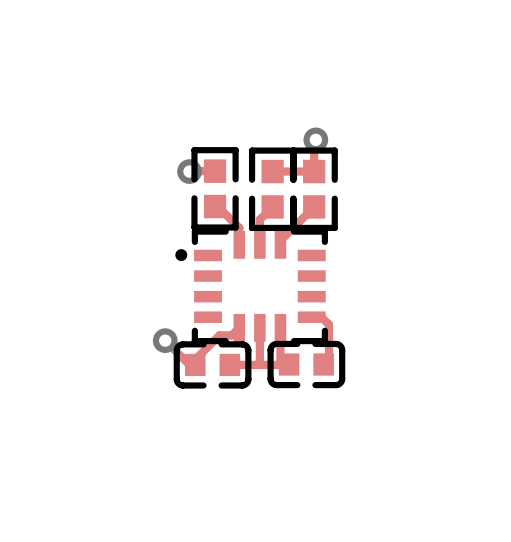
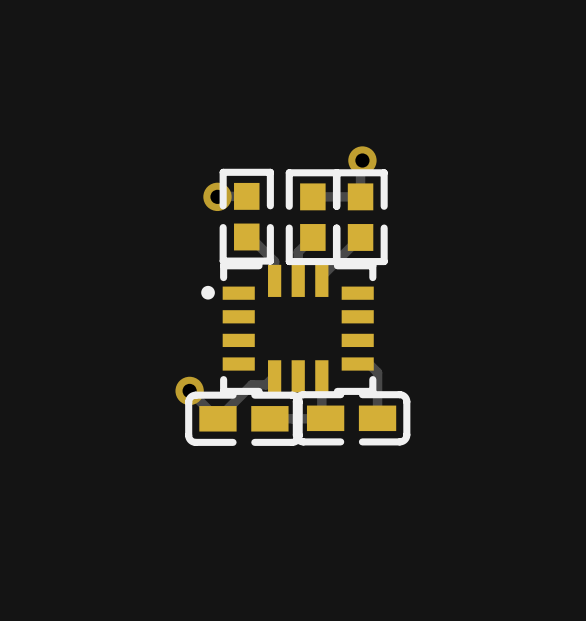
part footprint: [267, 340, 346, 389] -> [292, 391, 411, 446]
part footprint: [173, 341, 252, 389] -> [185, 391, 303, 446]

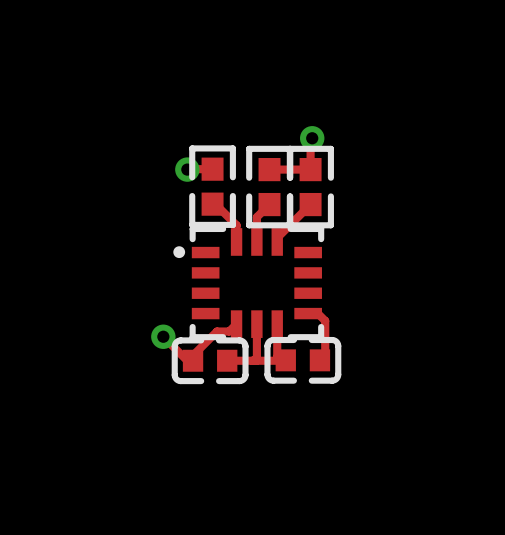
part footprint: [185, 391, 303, 446] -> [171, 337, 249, 385]
part footprint: [292, 391, 411, 446] -> [264, 336, 342, 384]

